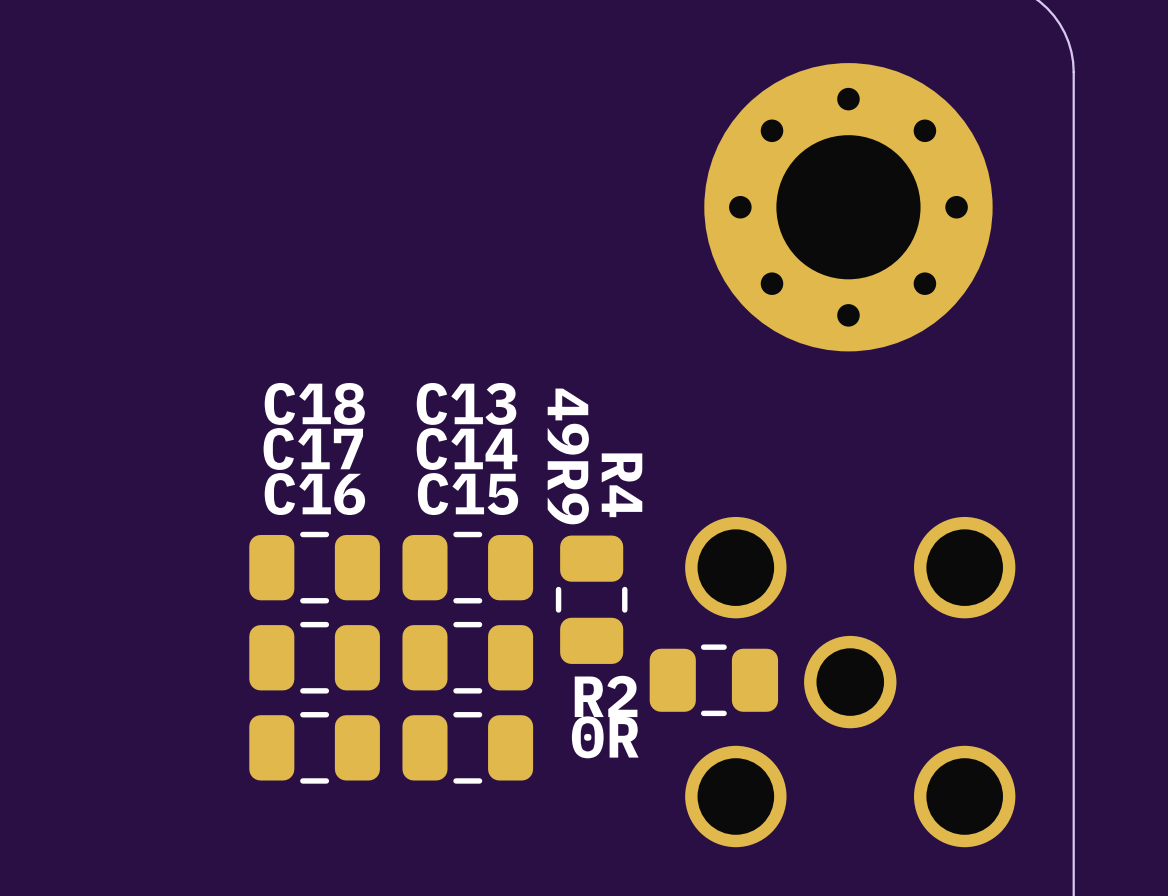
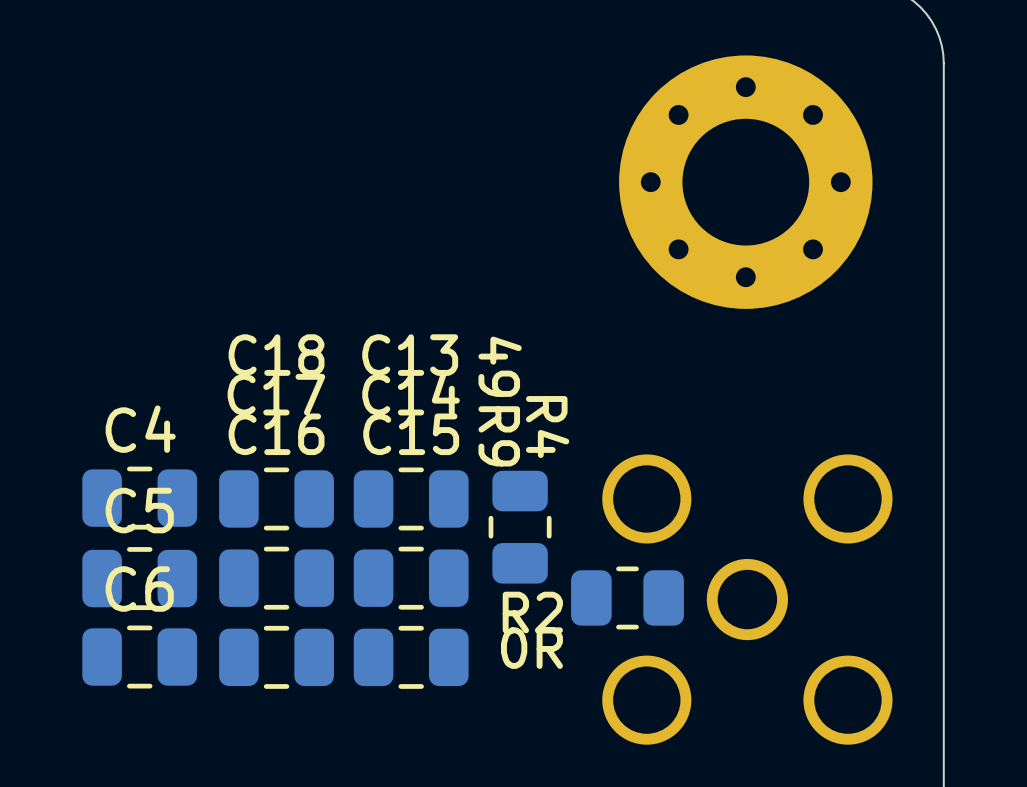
C4: none -> (139, 498)
C5: none -> (139, 578)
C6: none -> (139, 657)

